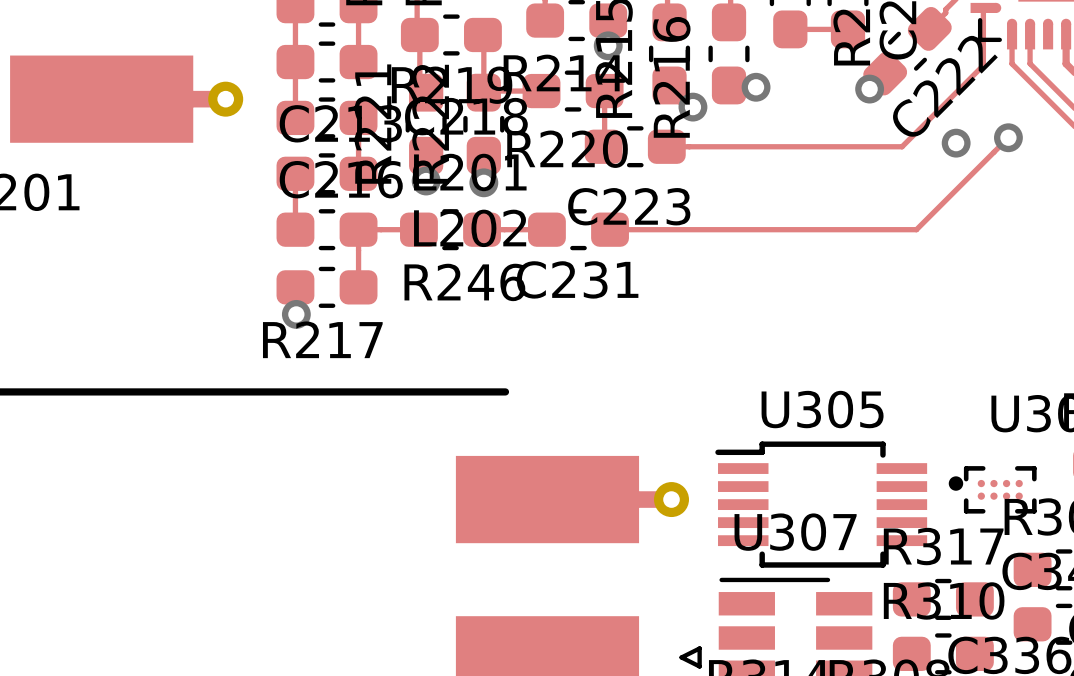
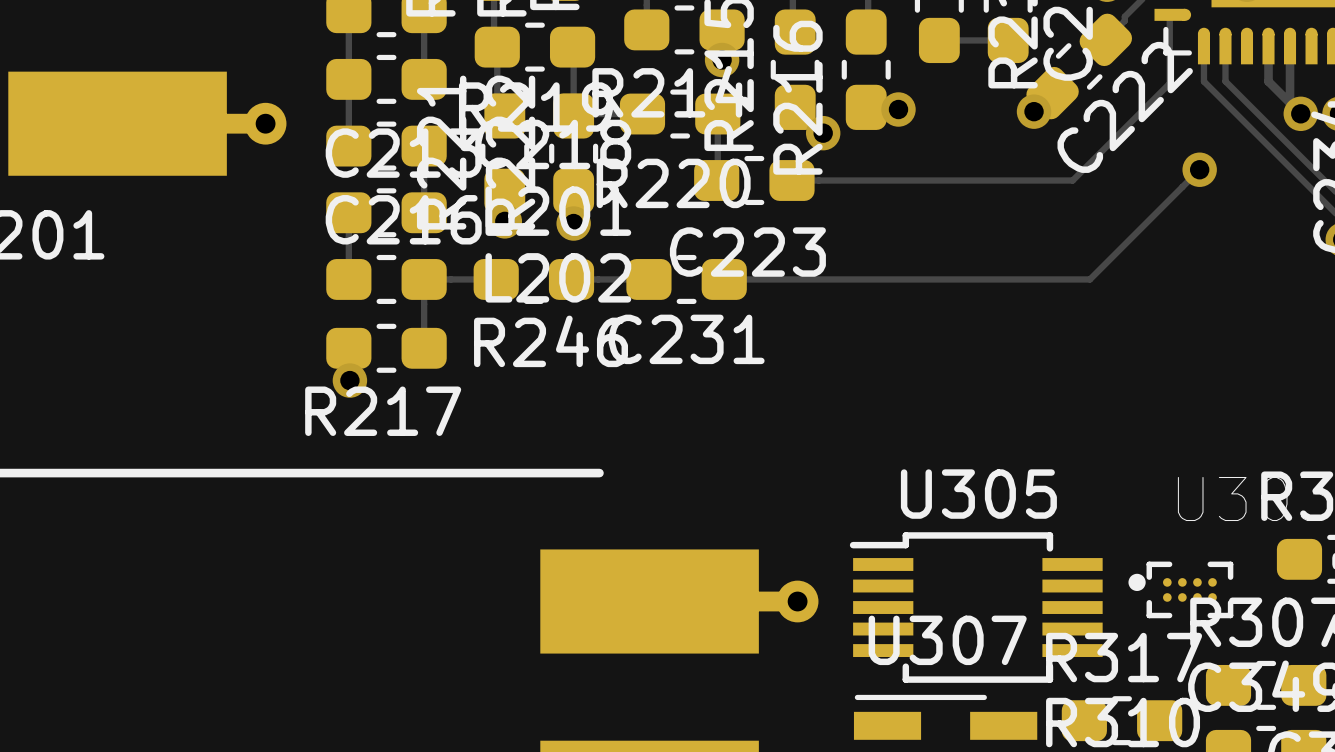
via: (956, 143) -> none

